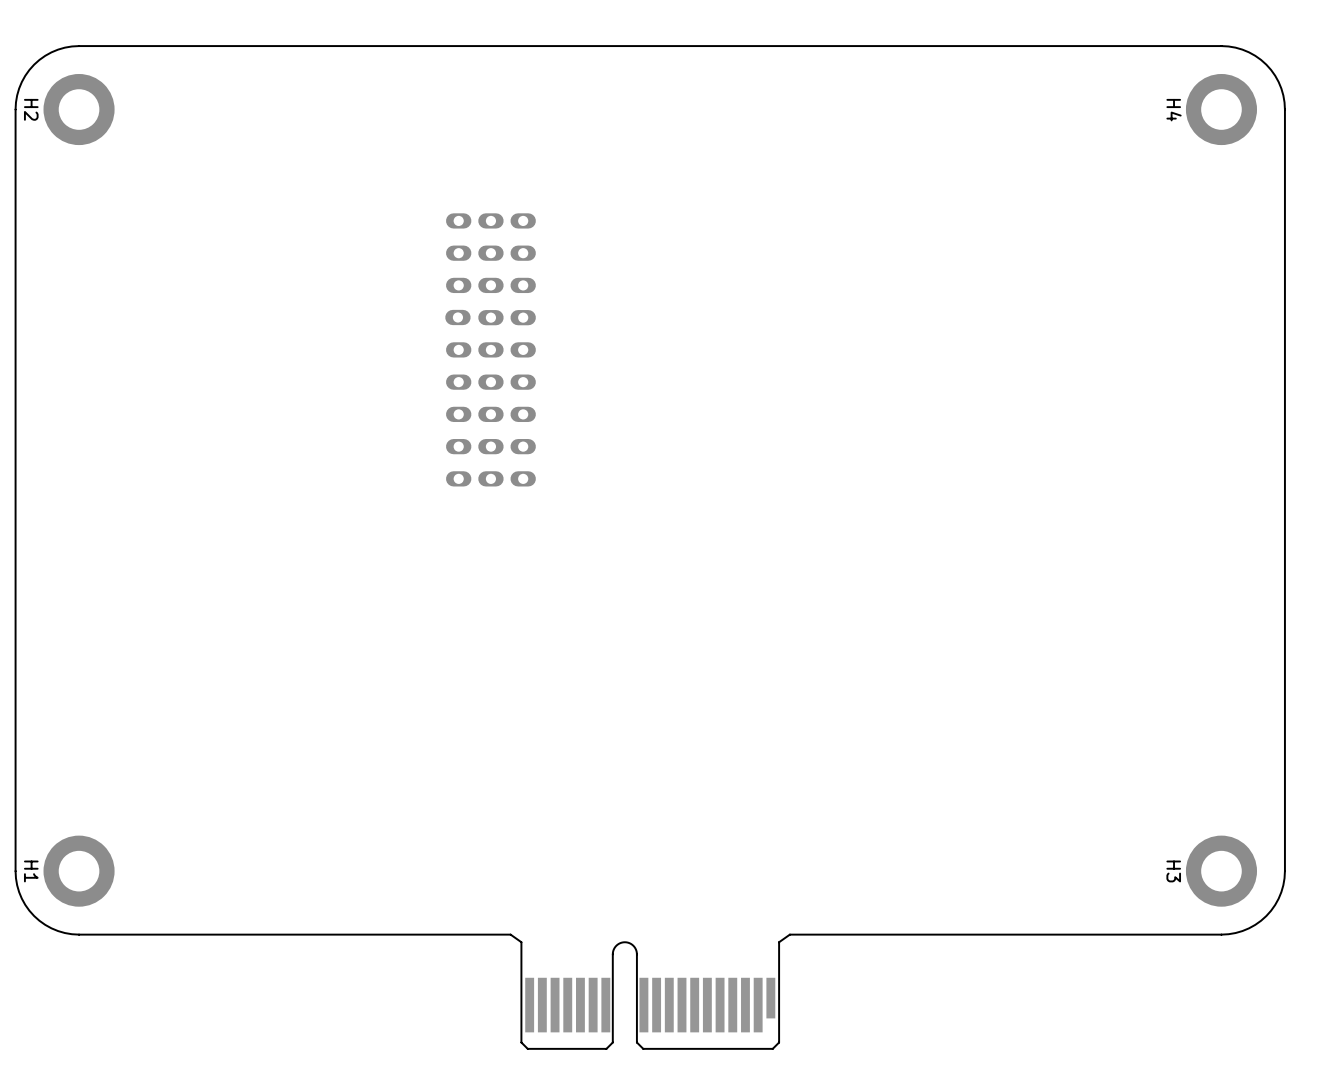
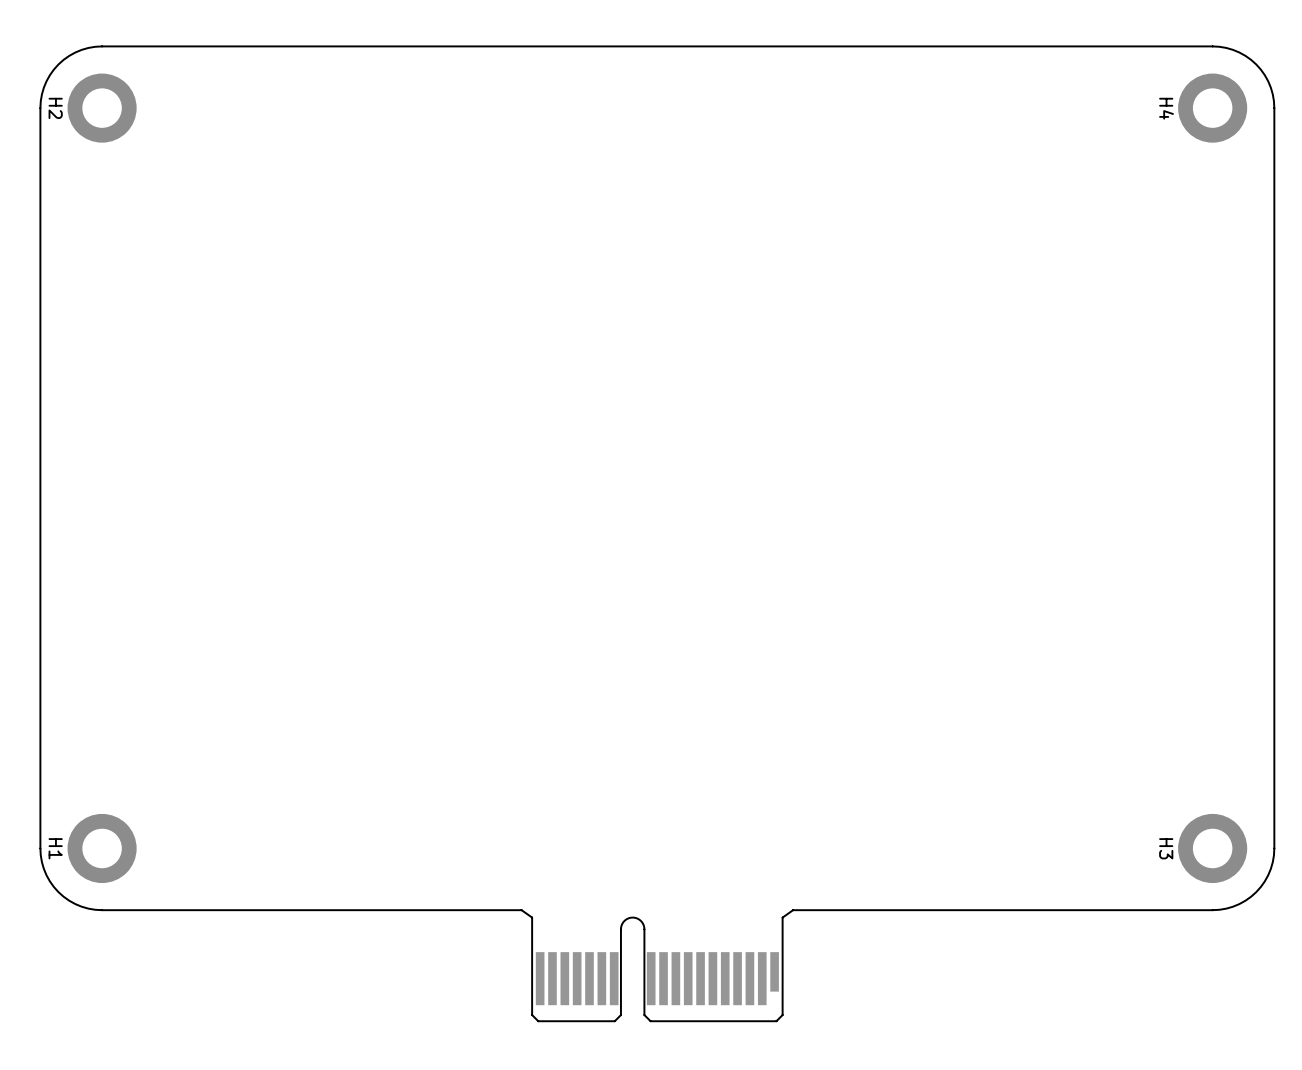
part: (490, 349) -> none

